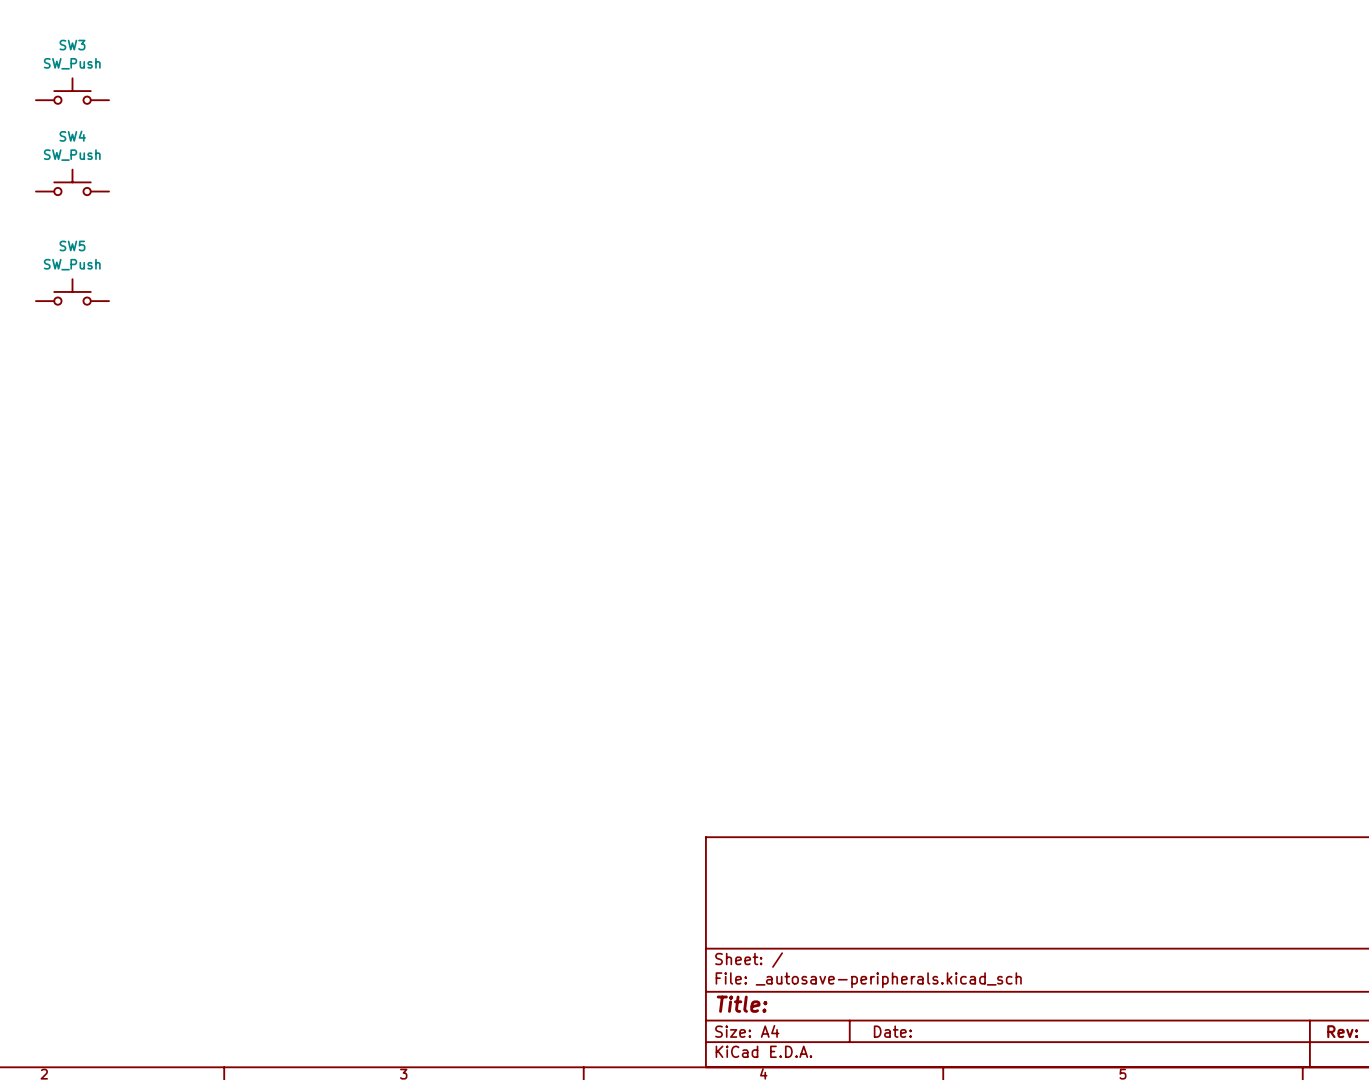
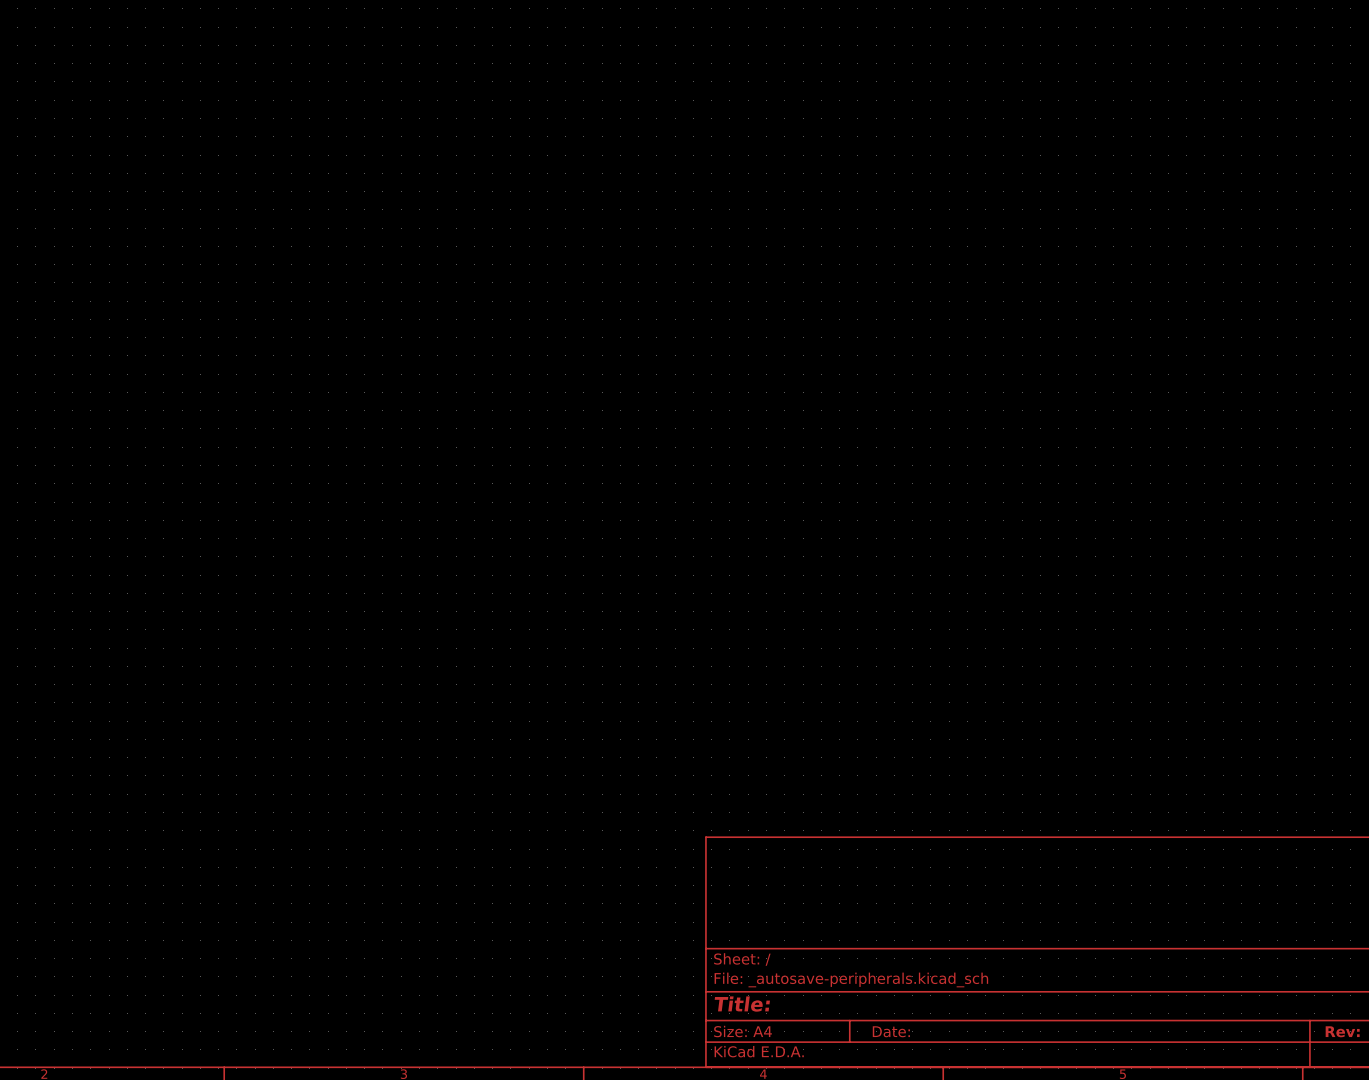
SW3: SW_Push (72, 91) -> none
SW4: SW_Push (72, 182) -> none
SW5: SW_Push (72, 291) -> none

